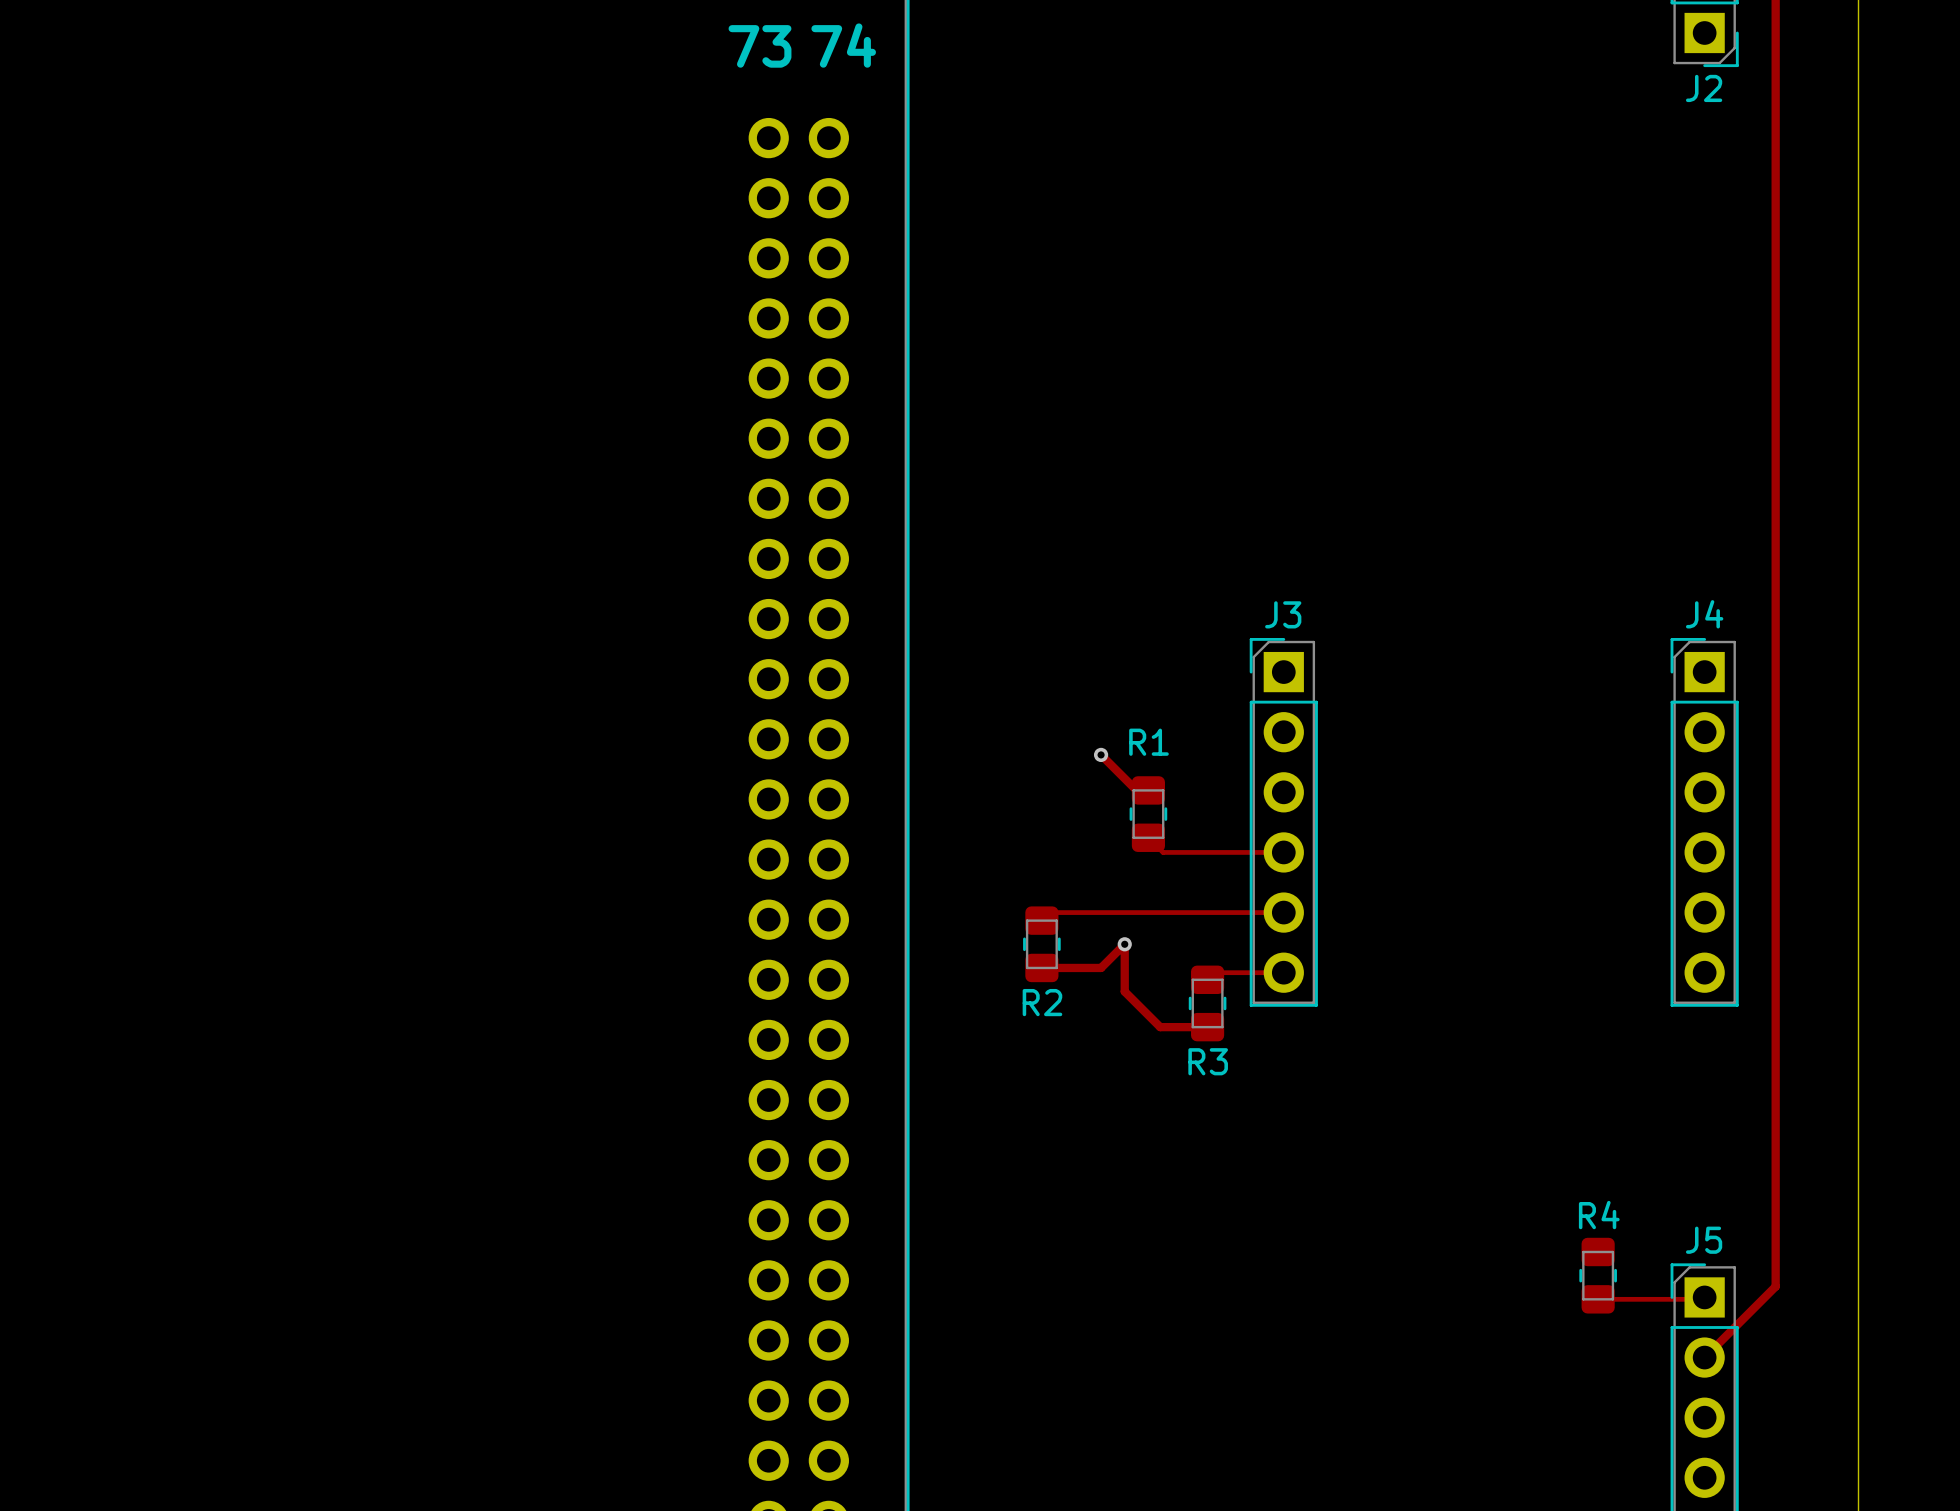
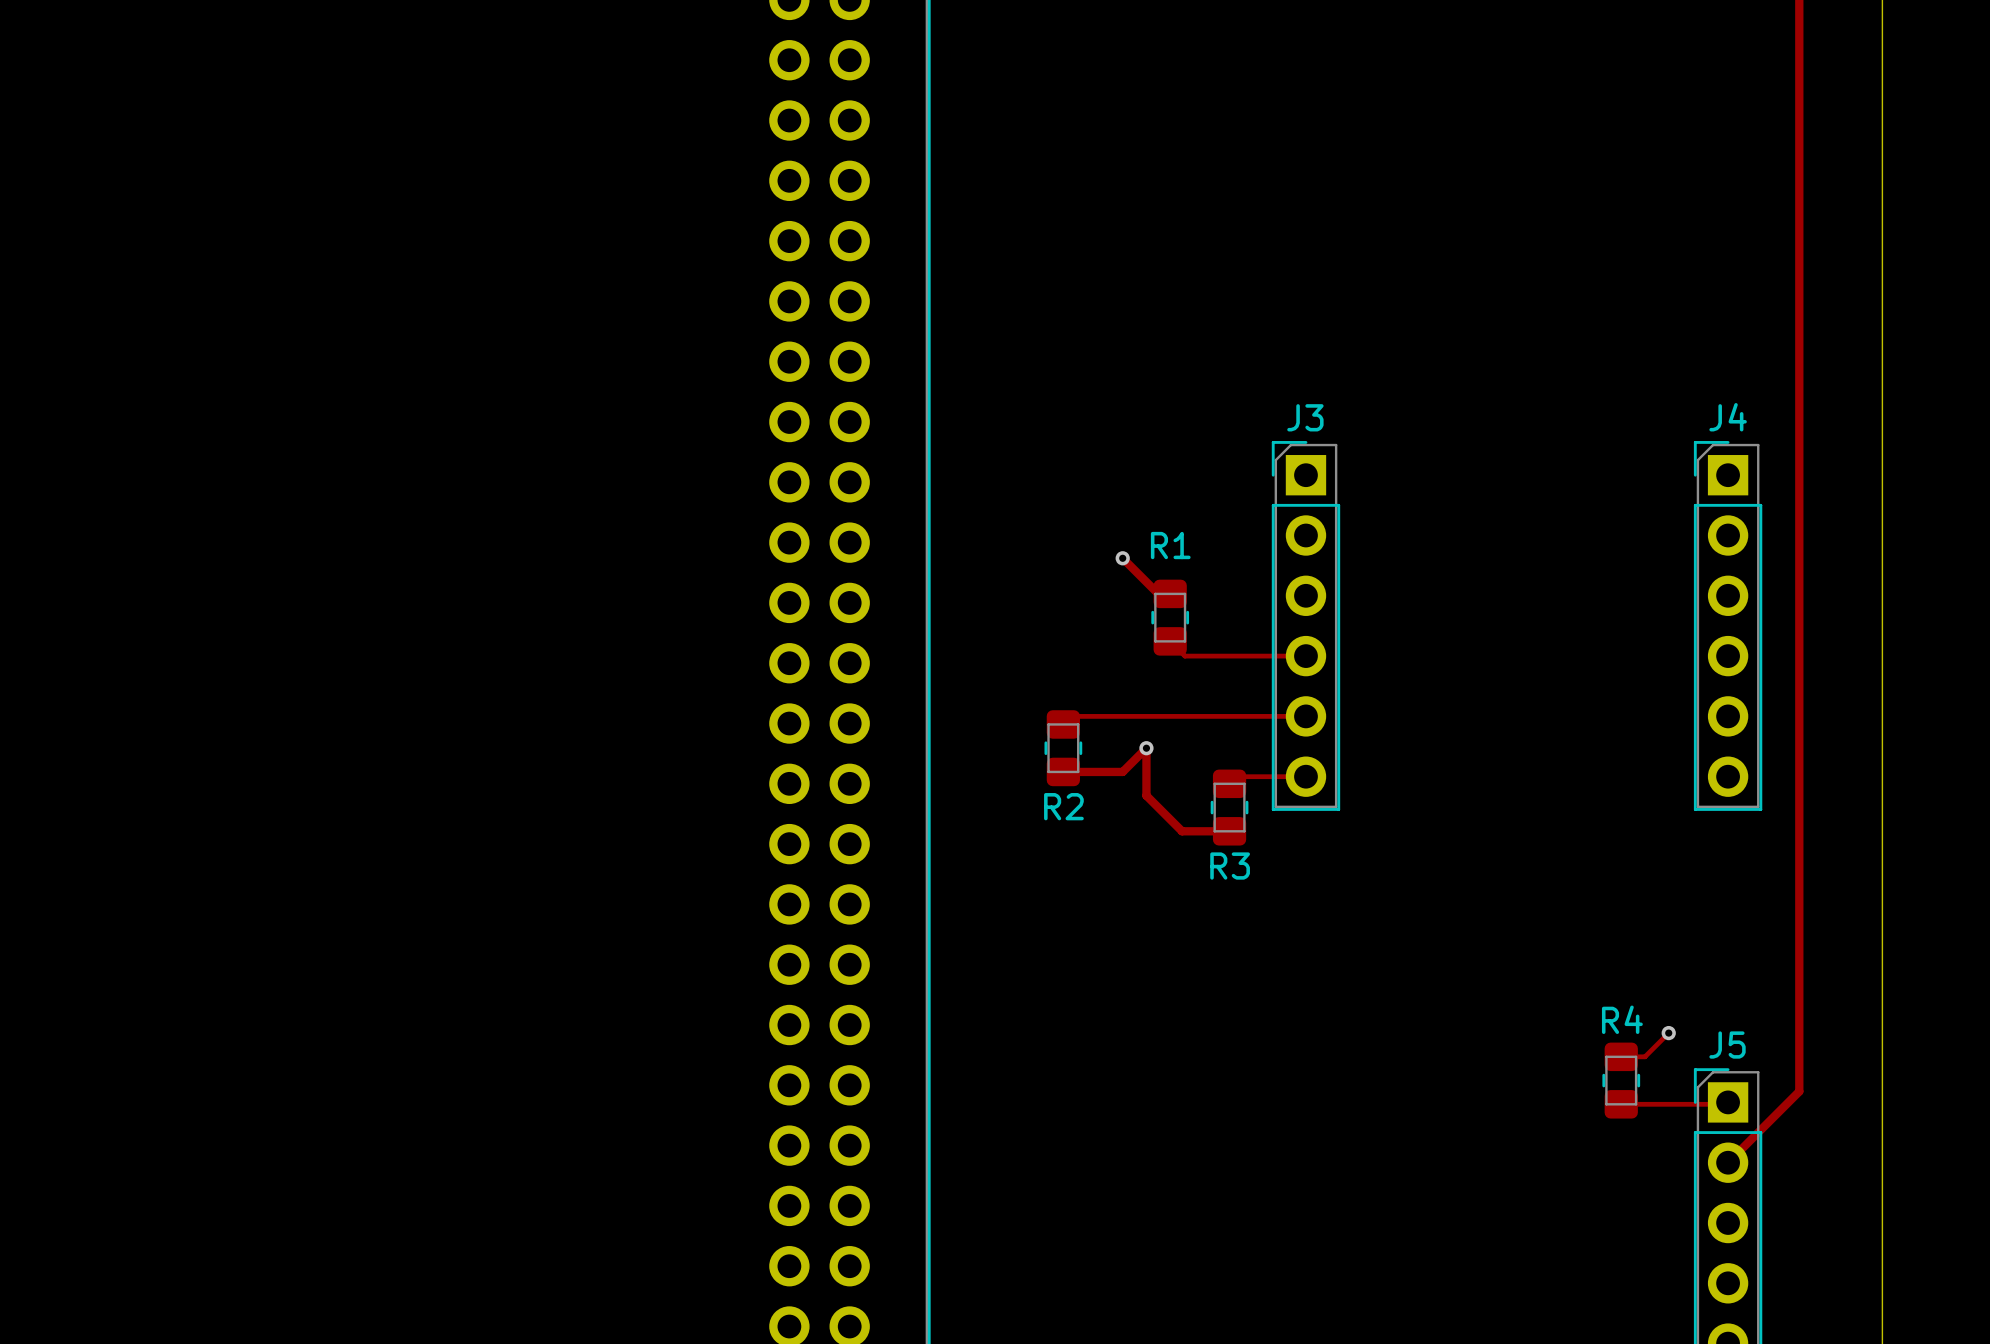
top track: none -> (1668, 1033) (1644, 1056) (1621, 1056)
via: none -> (1668, 1033)

